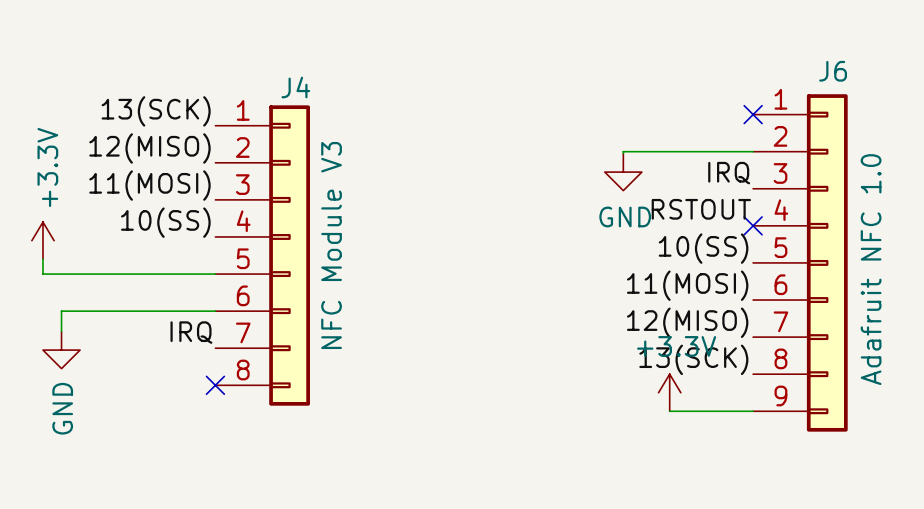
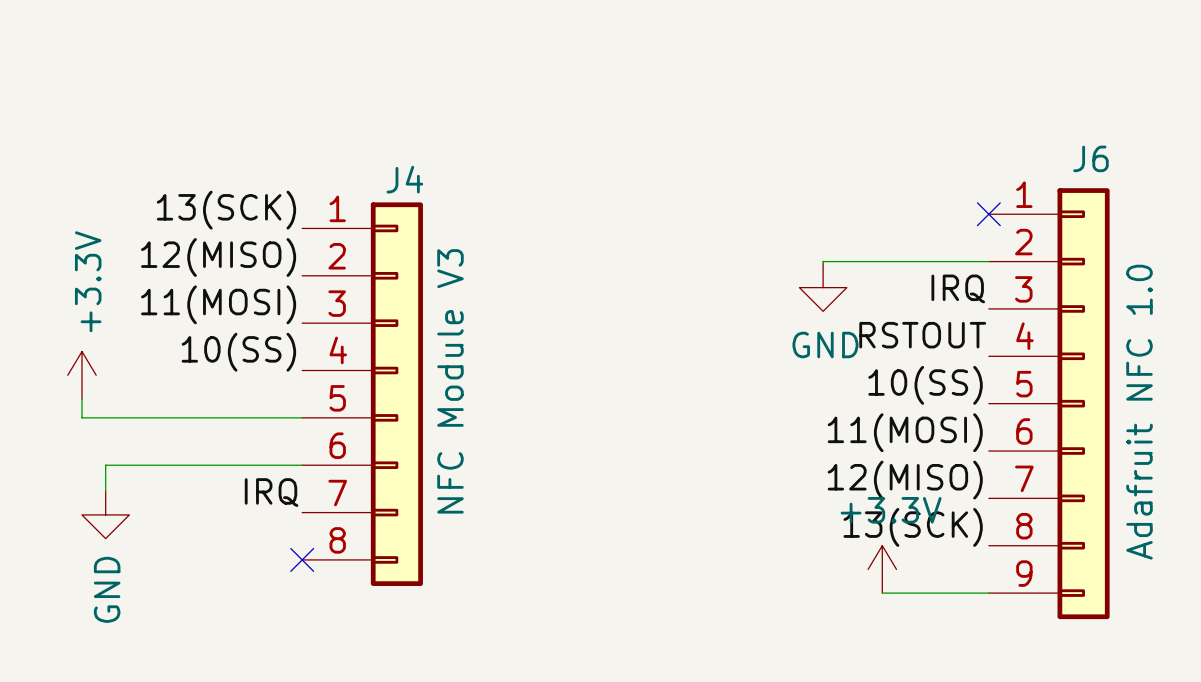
no-connect mark: (753, 225) -> none

